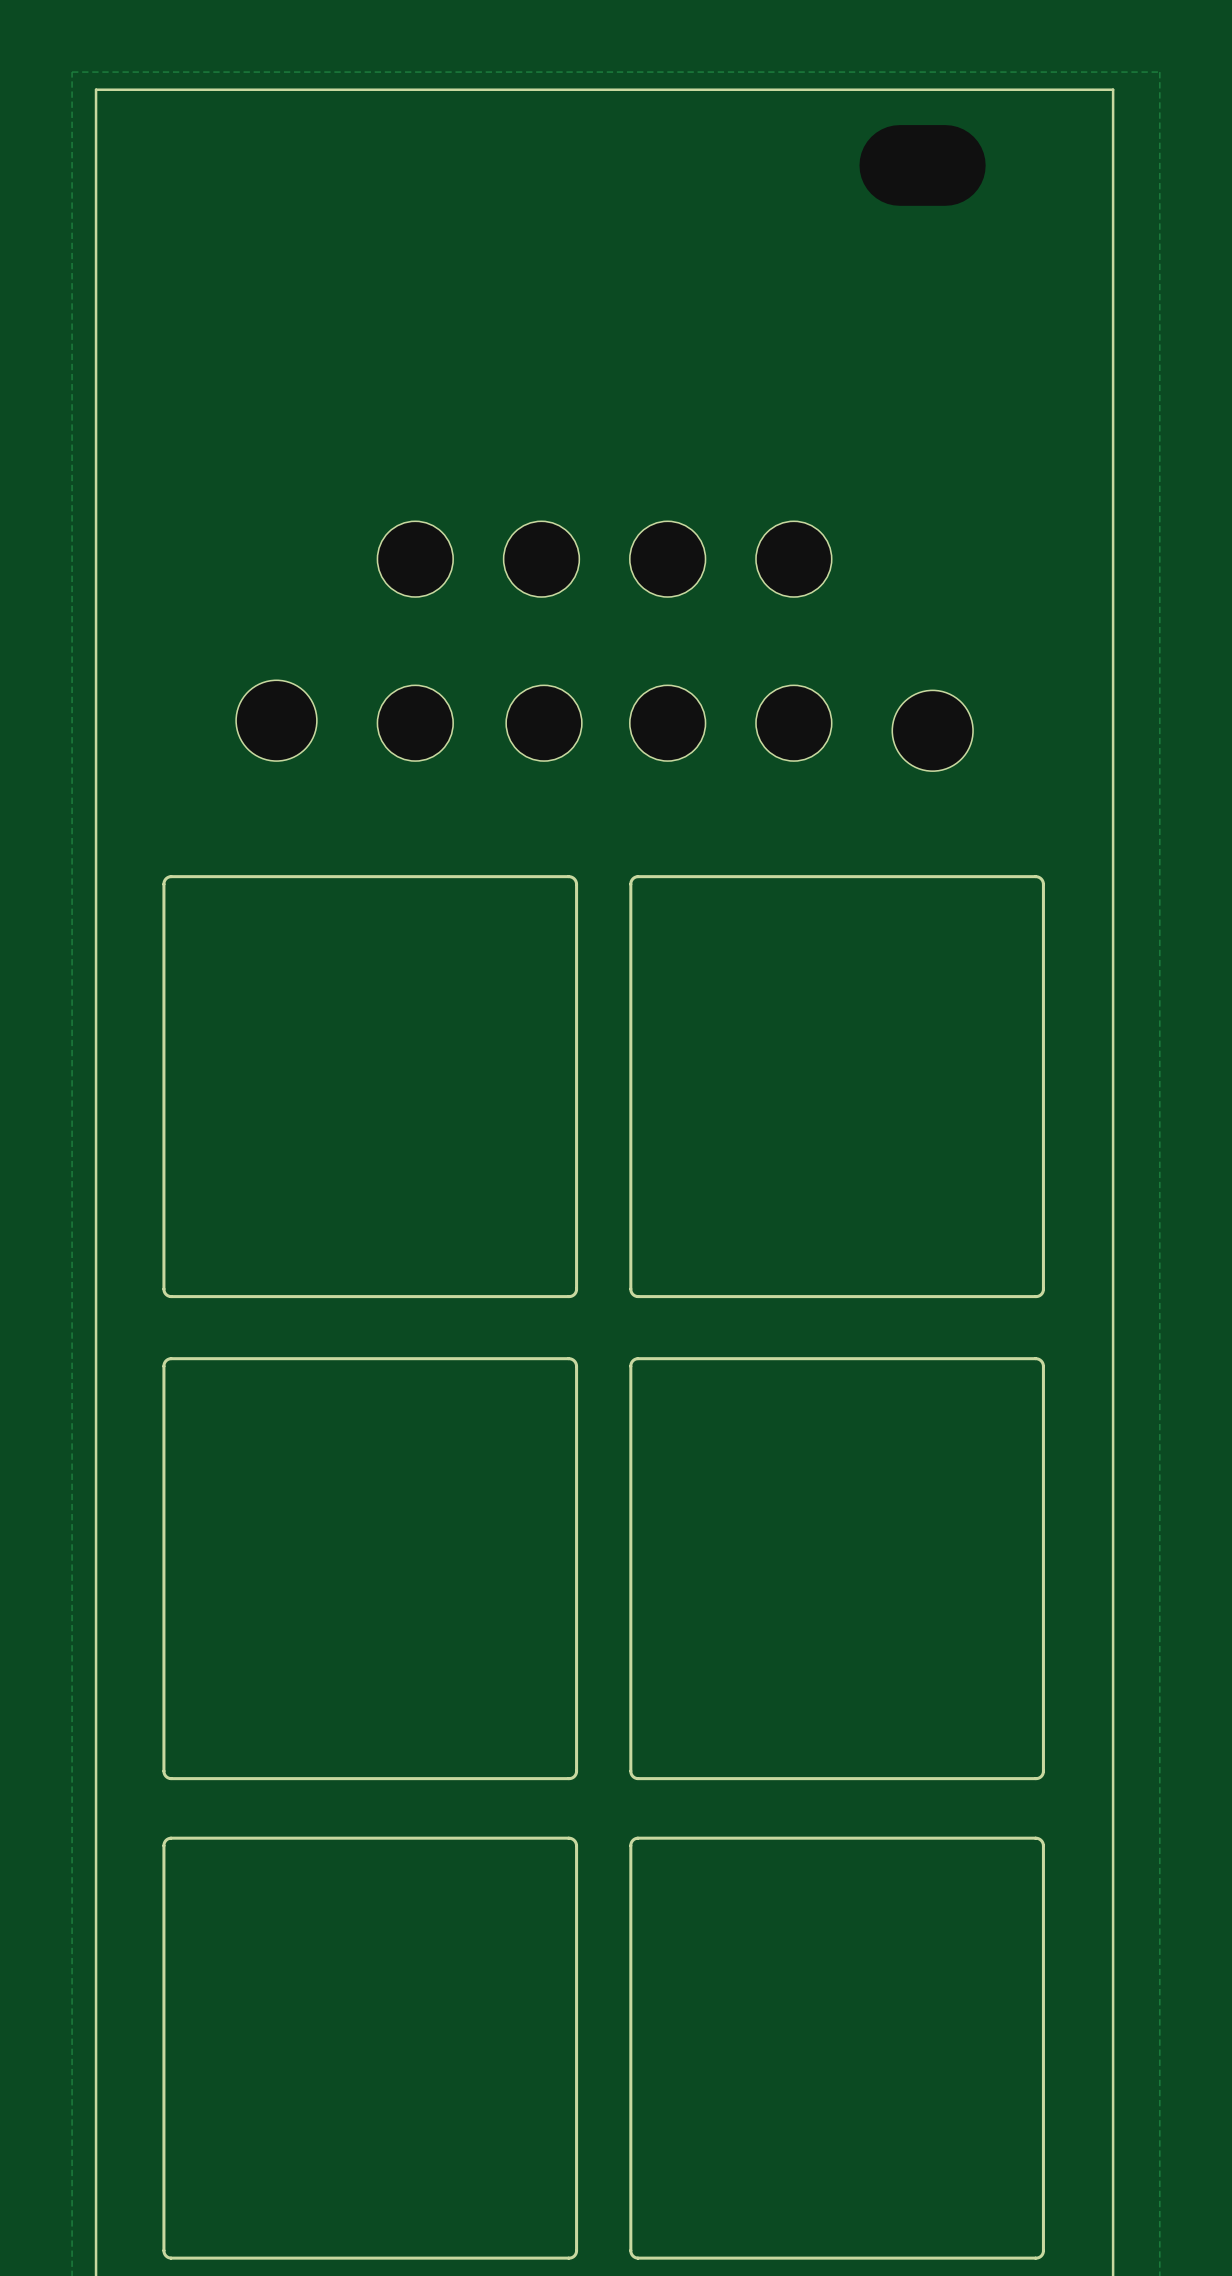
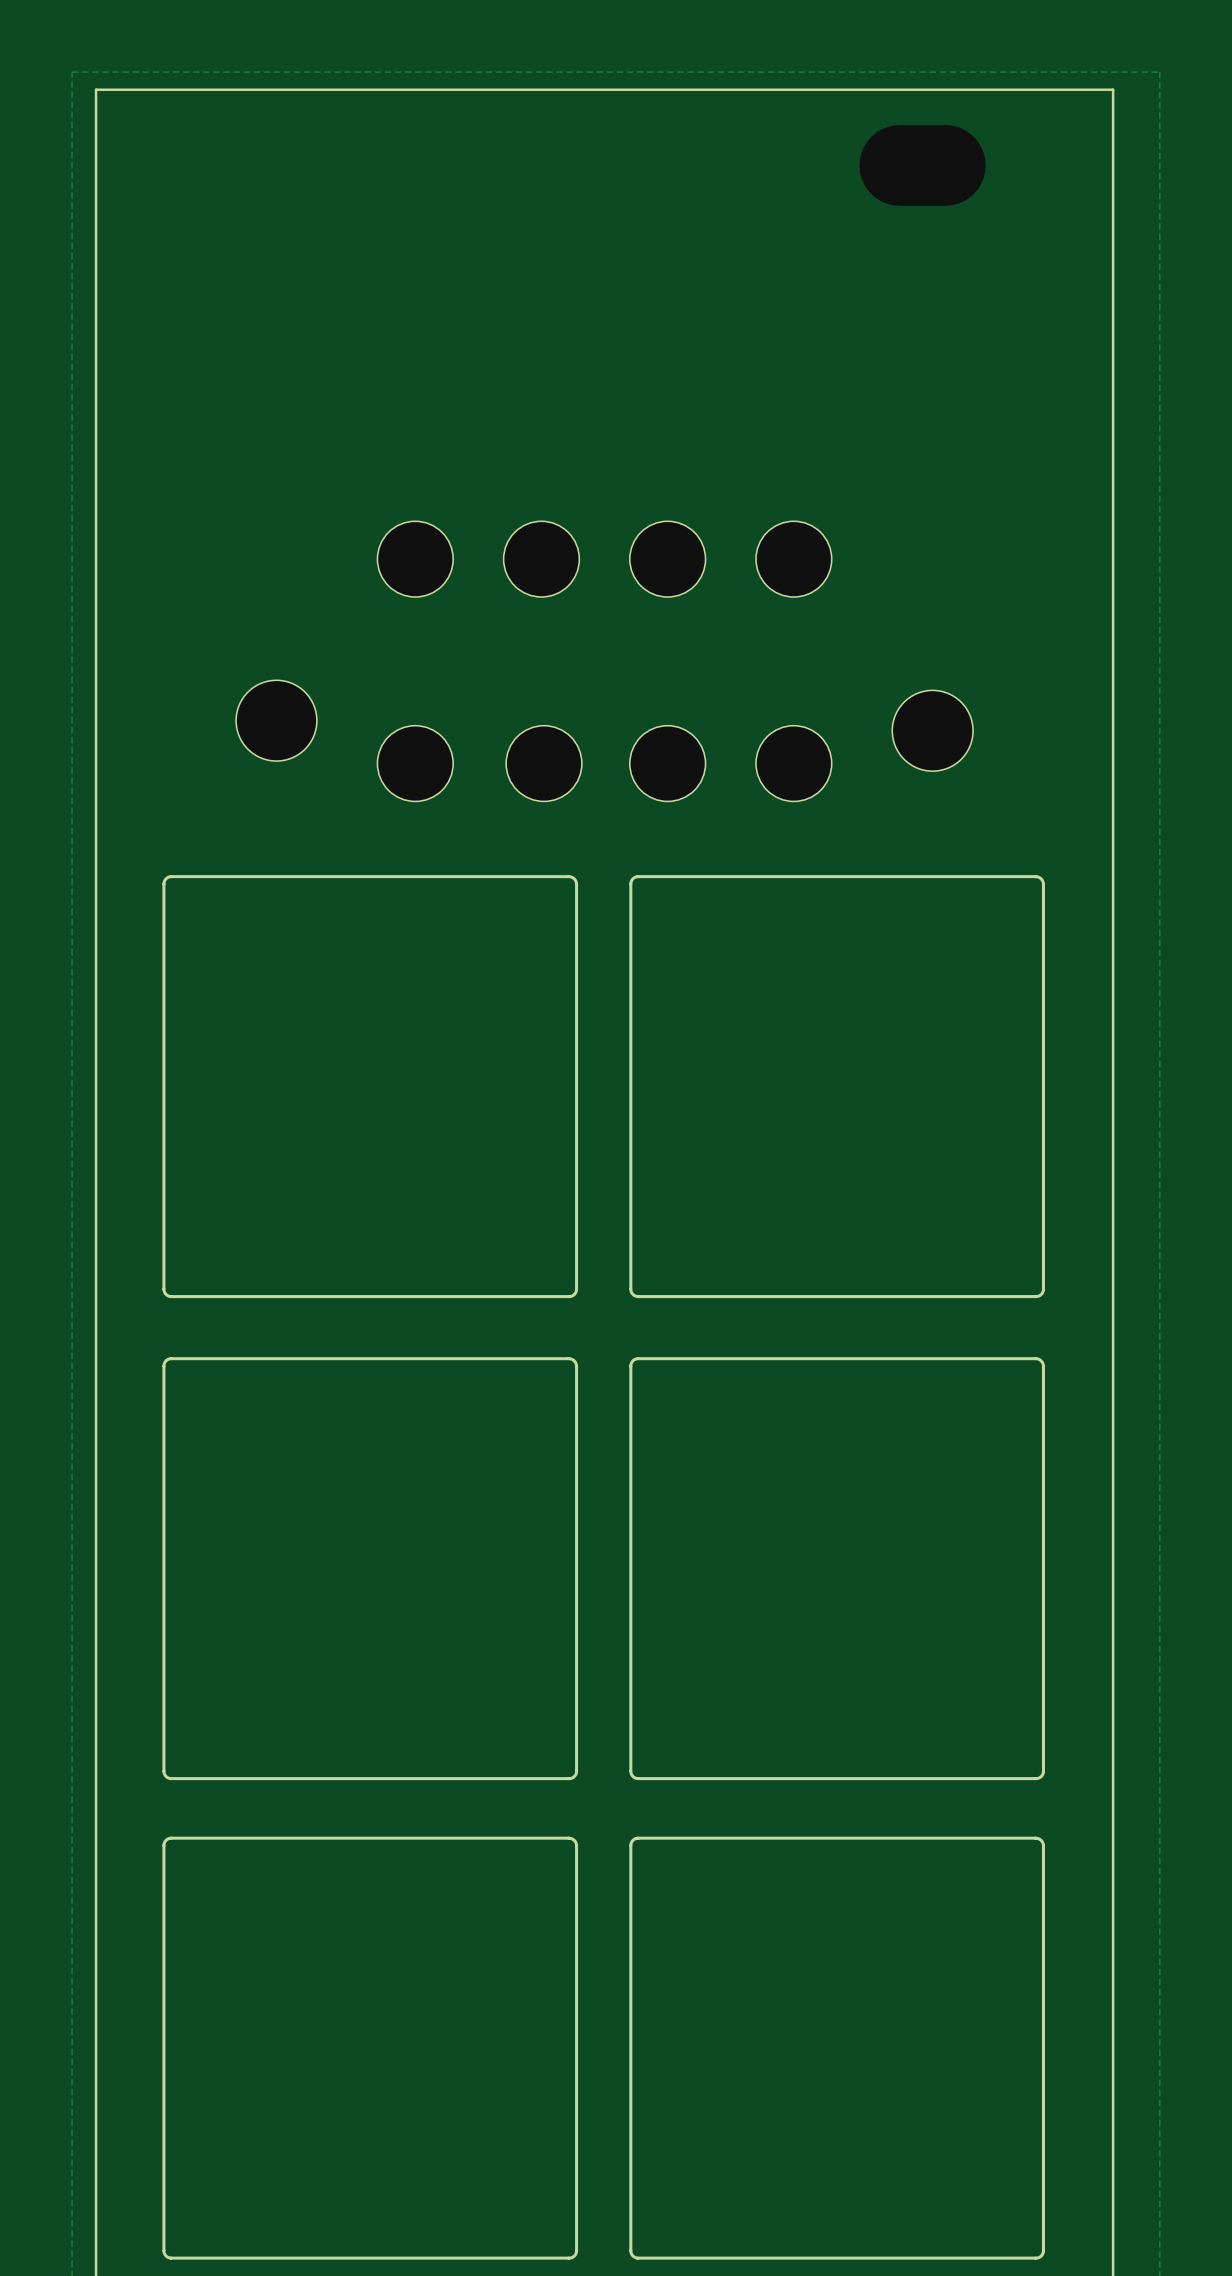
part position: (415, 723) -> (415, 763)
part position: (544, 723) -> (544, 763)
part position: (667, 723) -> (667, 763)
part position: (793, 723) -> (793, 763)

